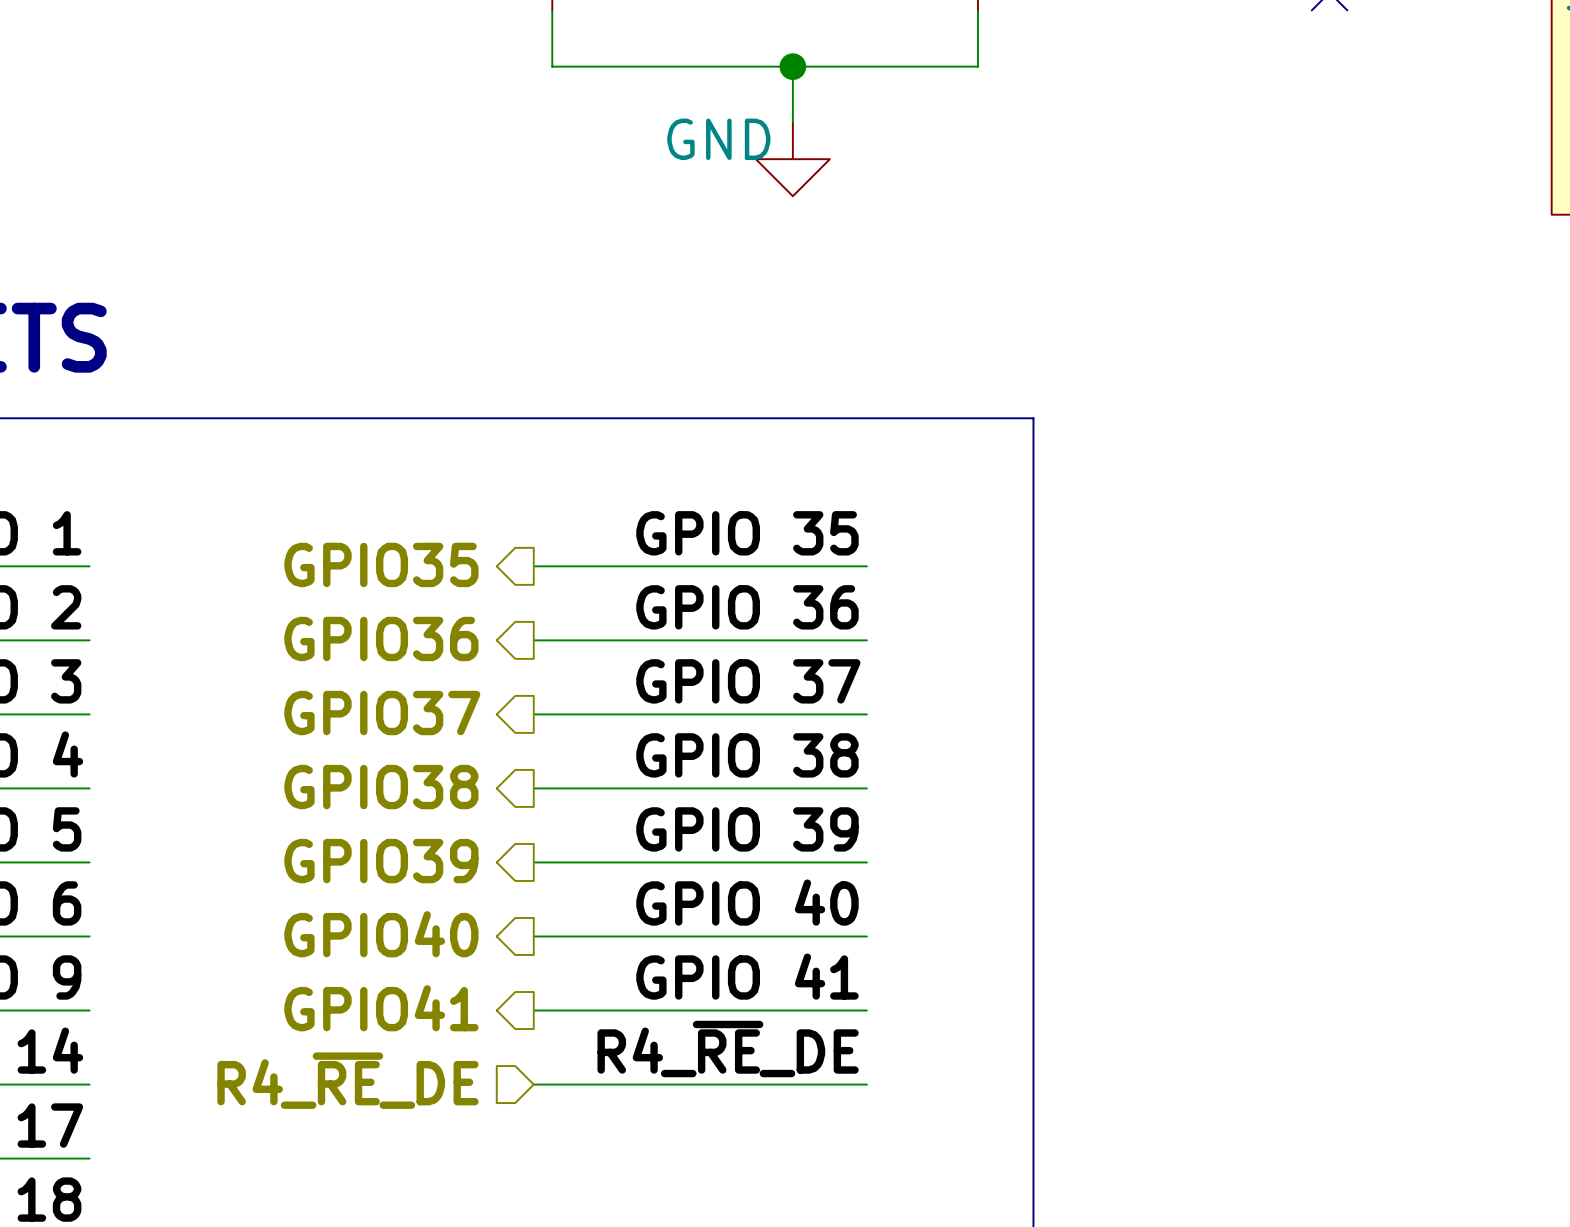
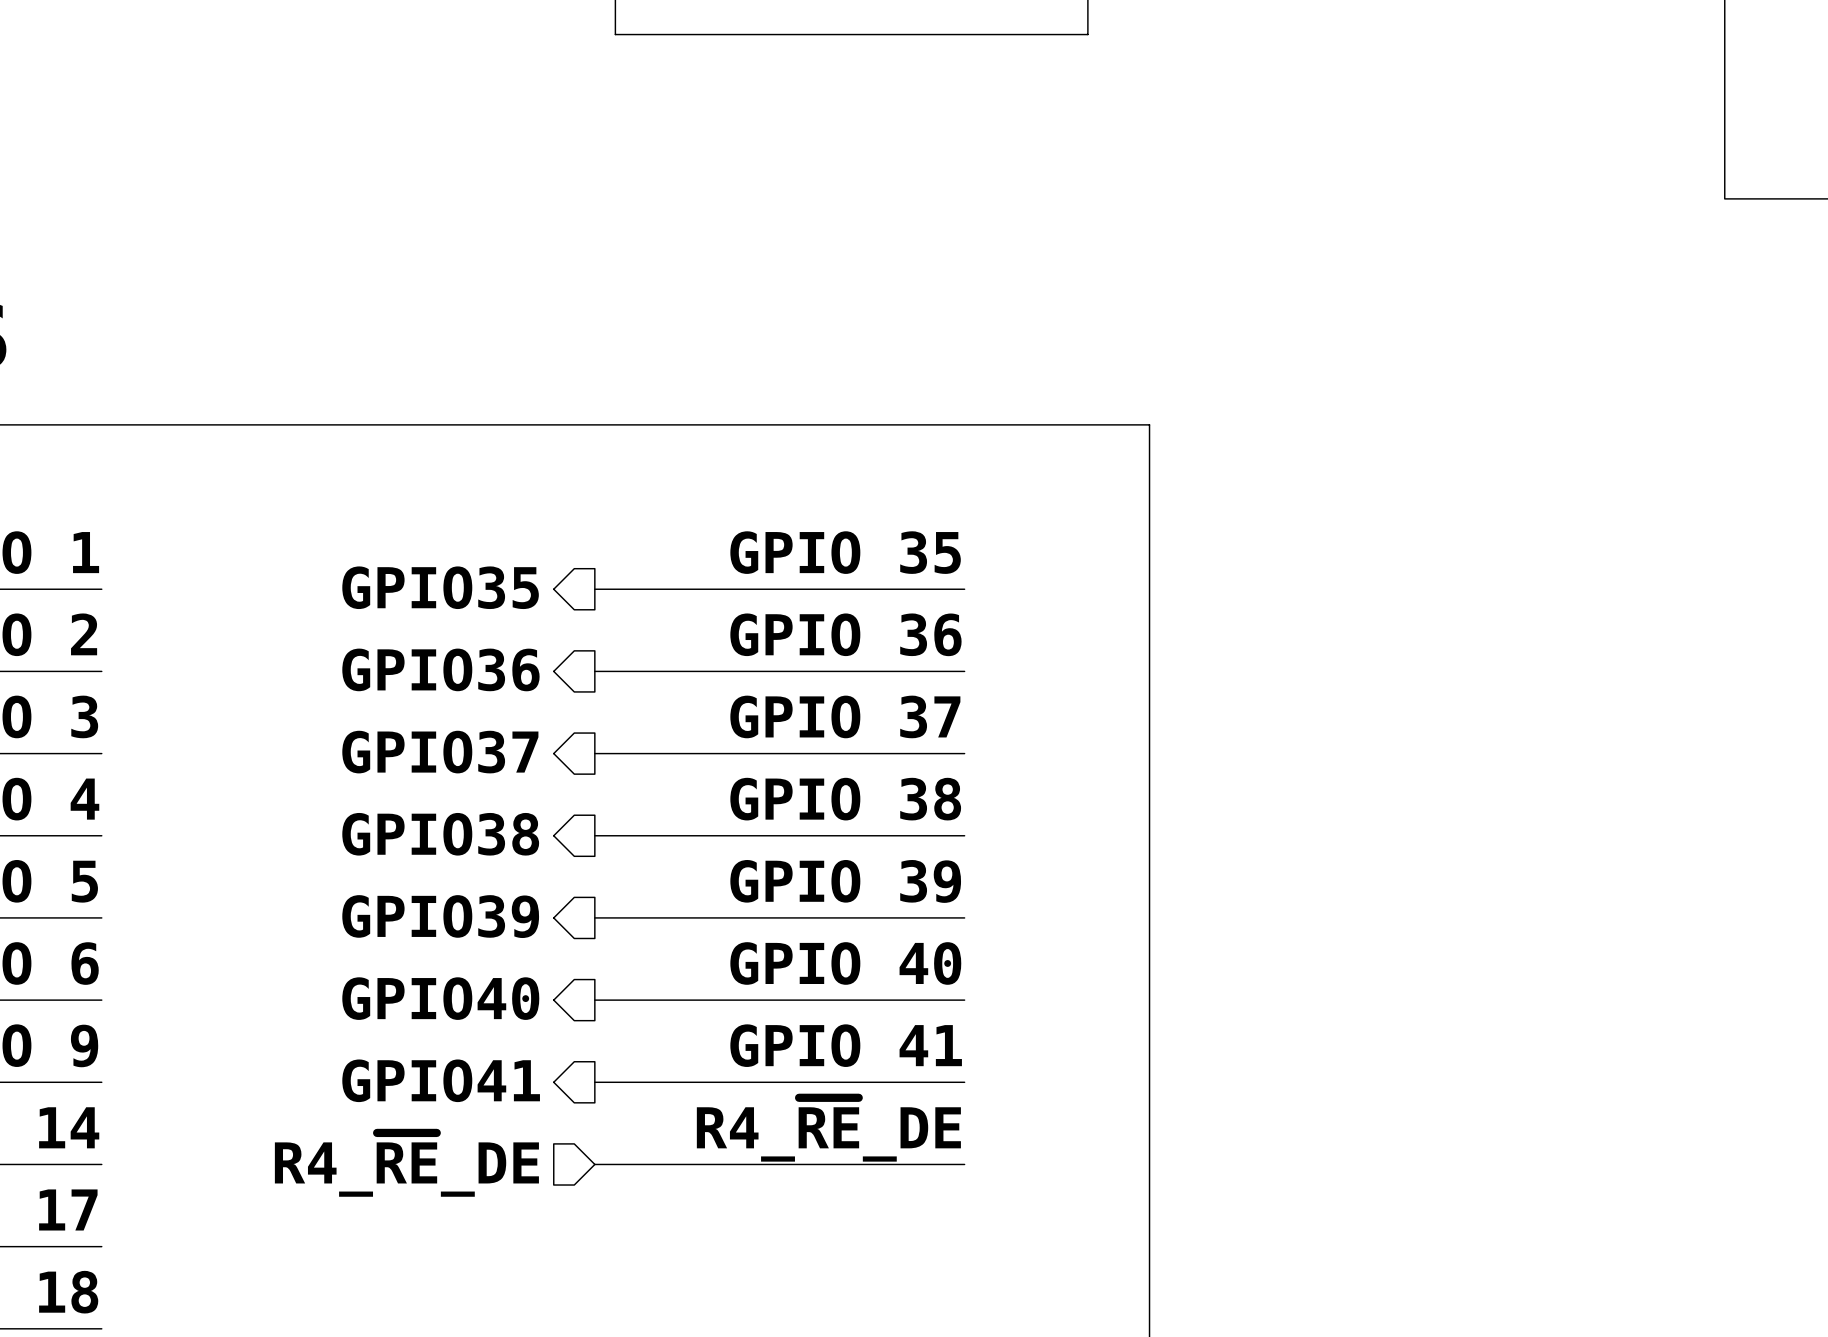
wire: (792, 66) (792, 122) -> none
junction: (792, 66) -> none
power symbol: GND (792, 159) -> none

